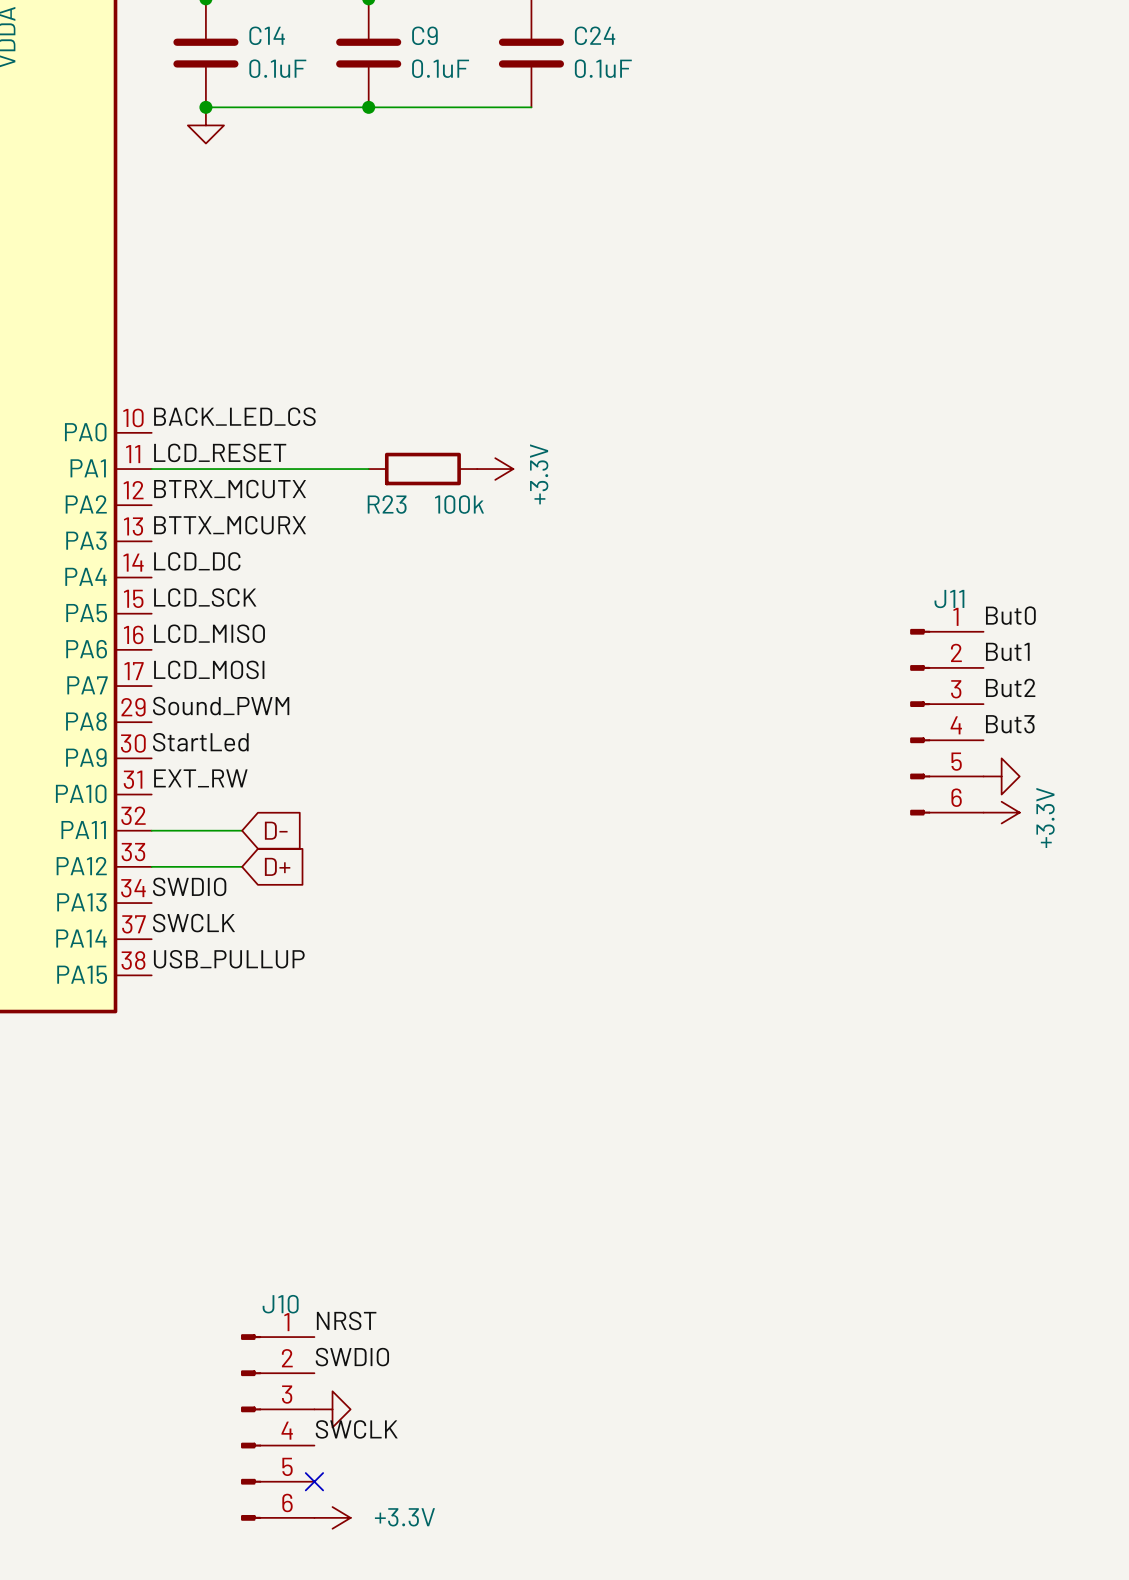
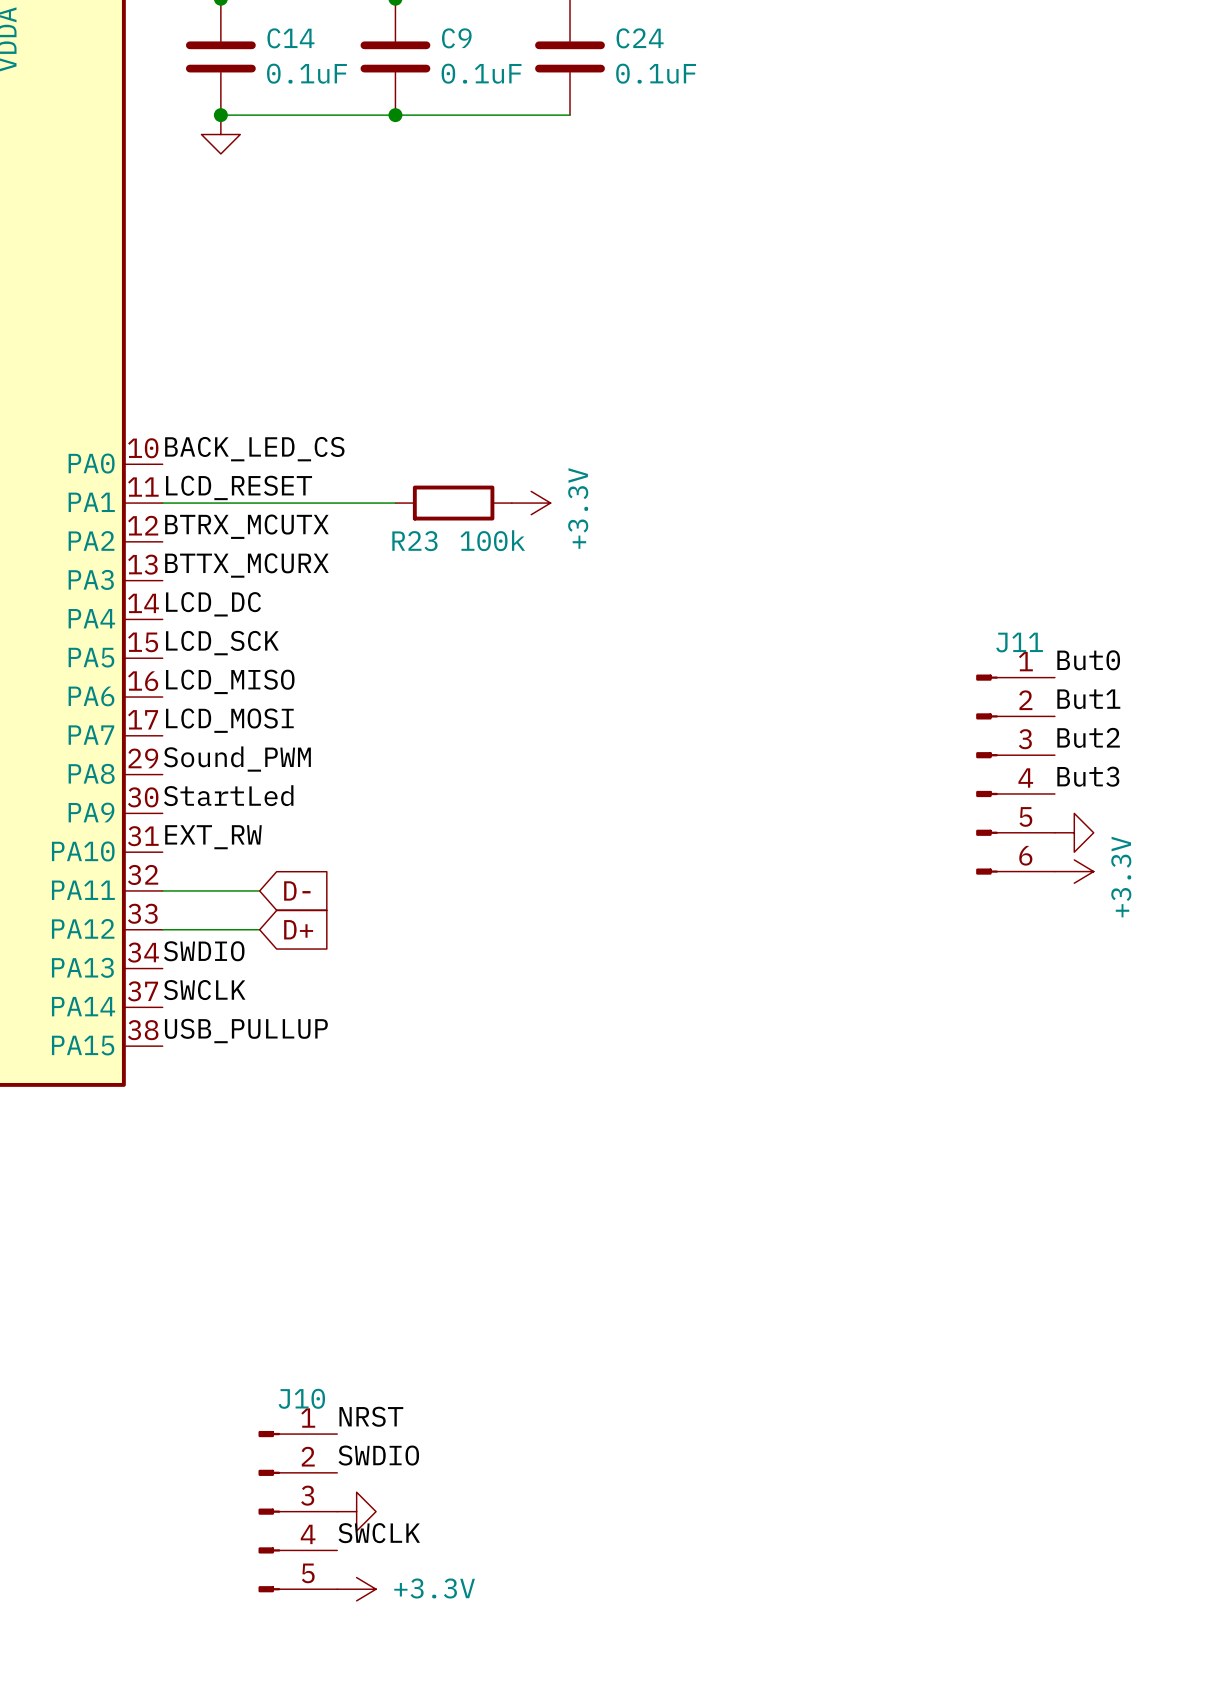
J10 symbol: [241, 1334, 315, 1521] -> [258, 1430, 338, 1593]
no-connect mark: (314, 1481) -> none
power symbol position: +3.3V (332, 1517) -> +3.3V (356, 1589)

